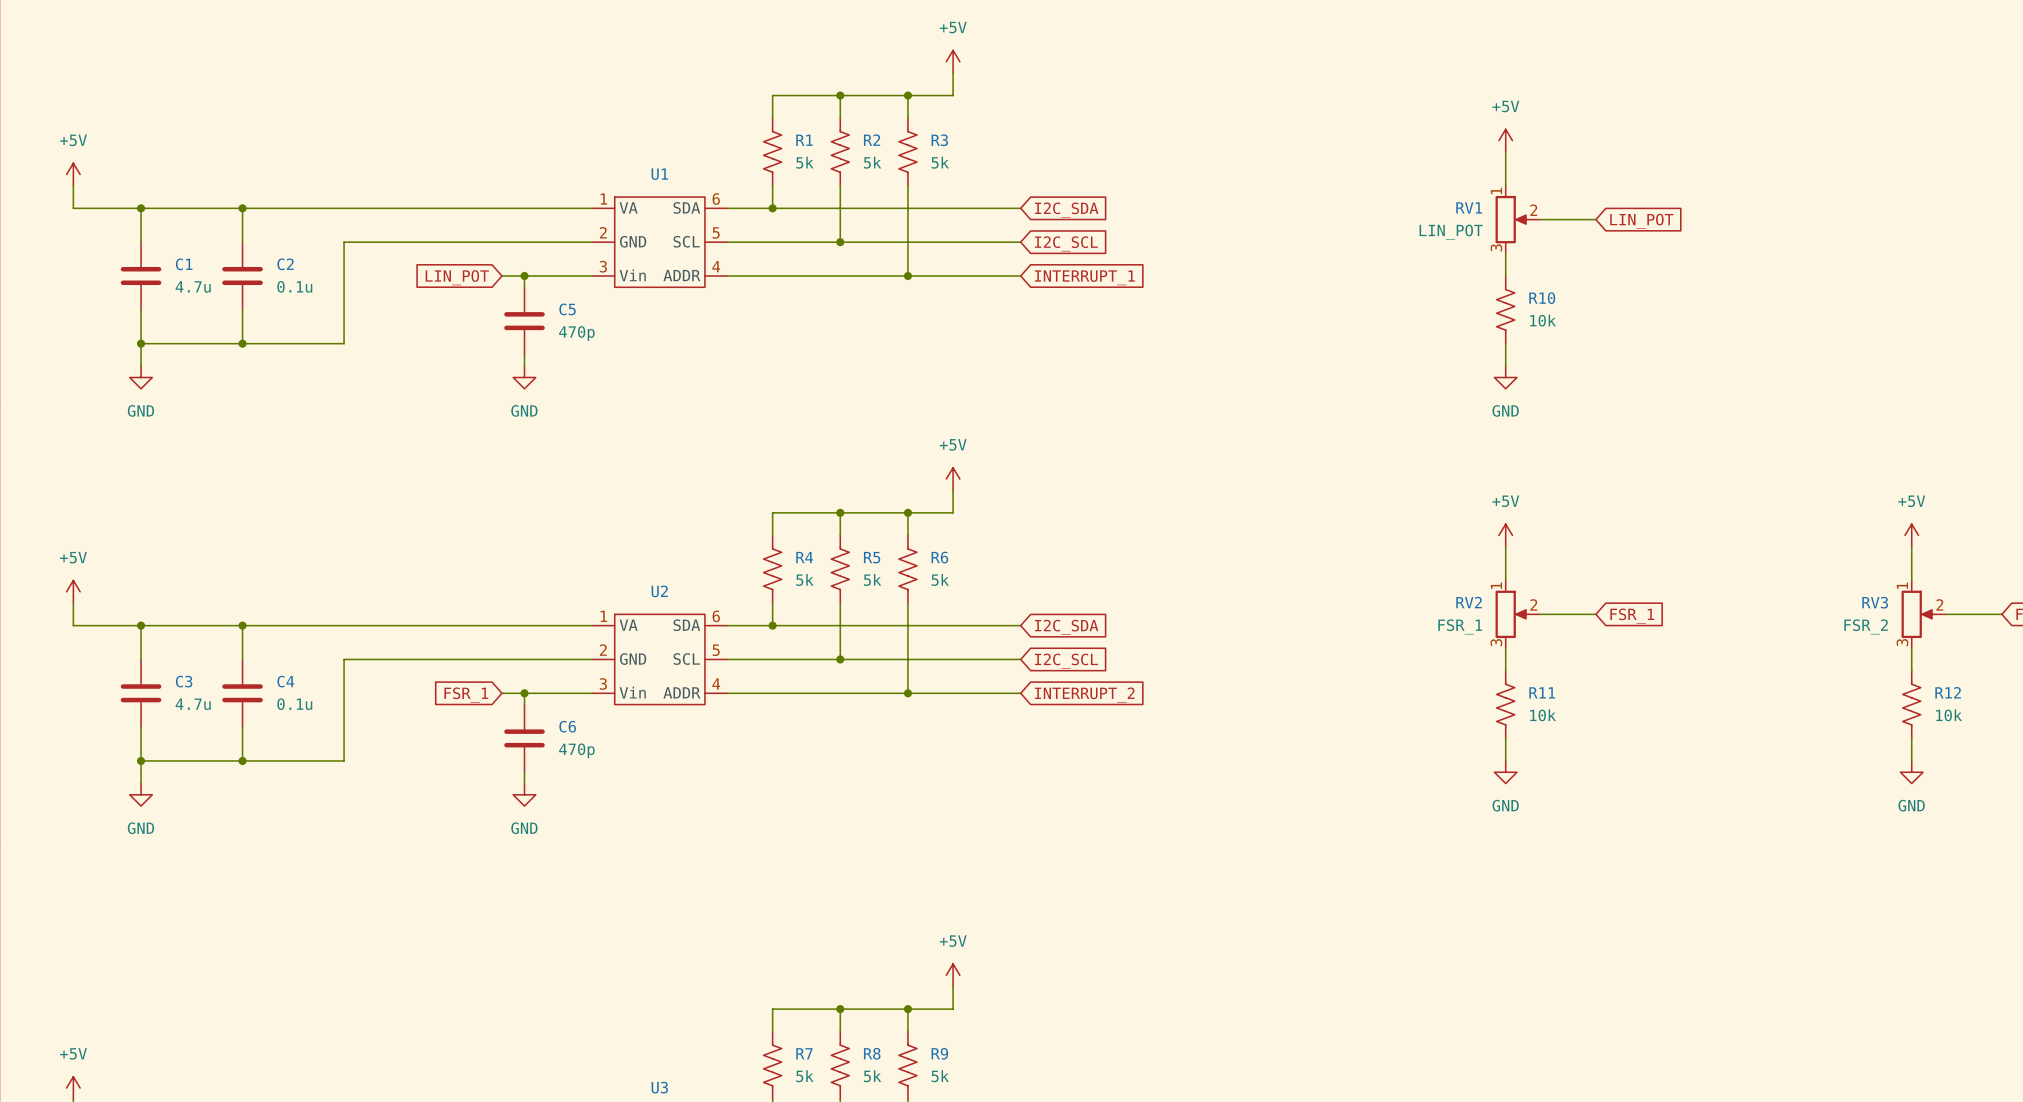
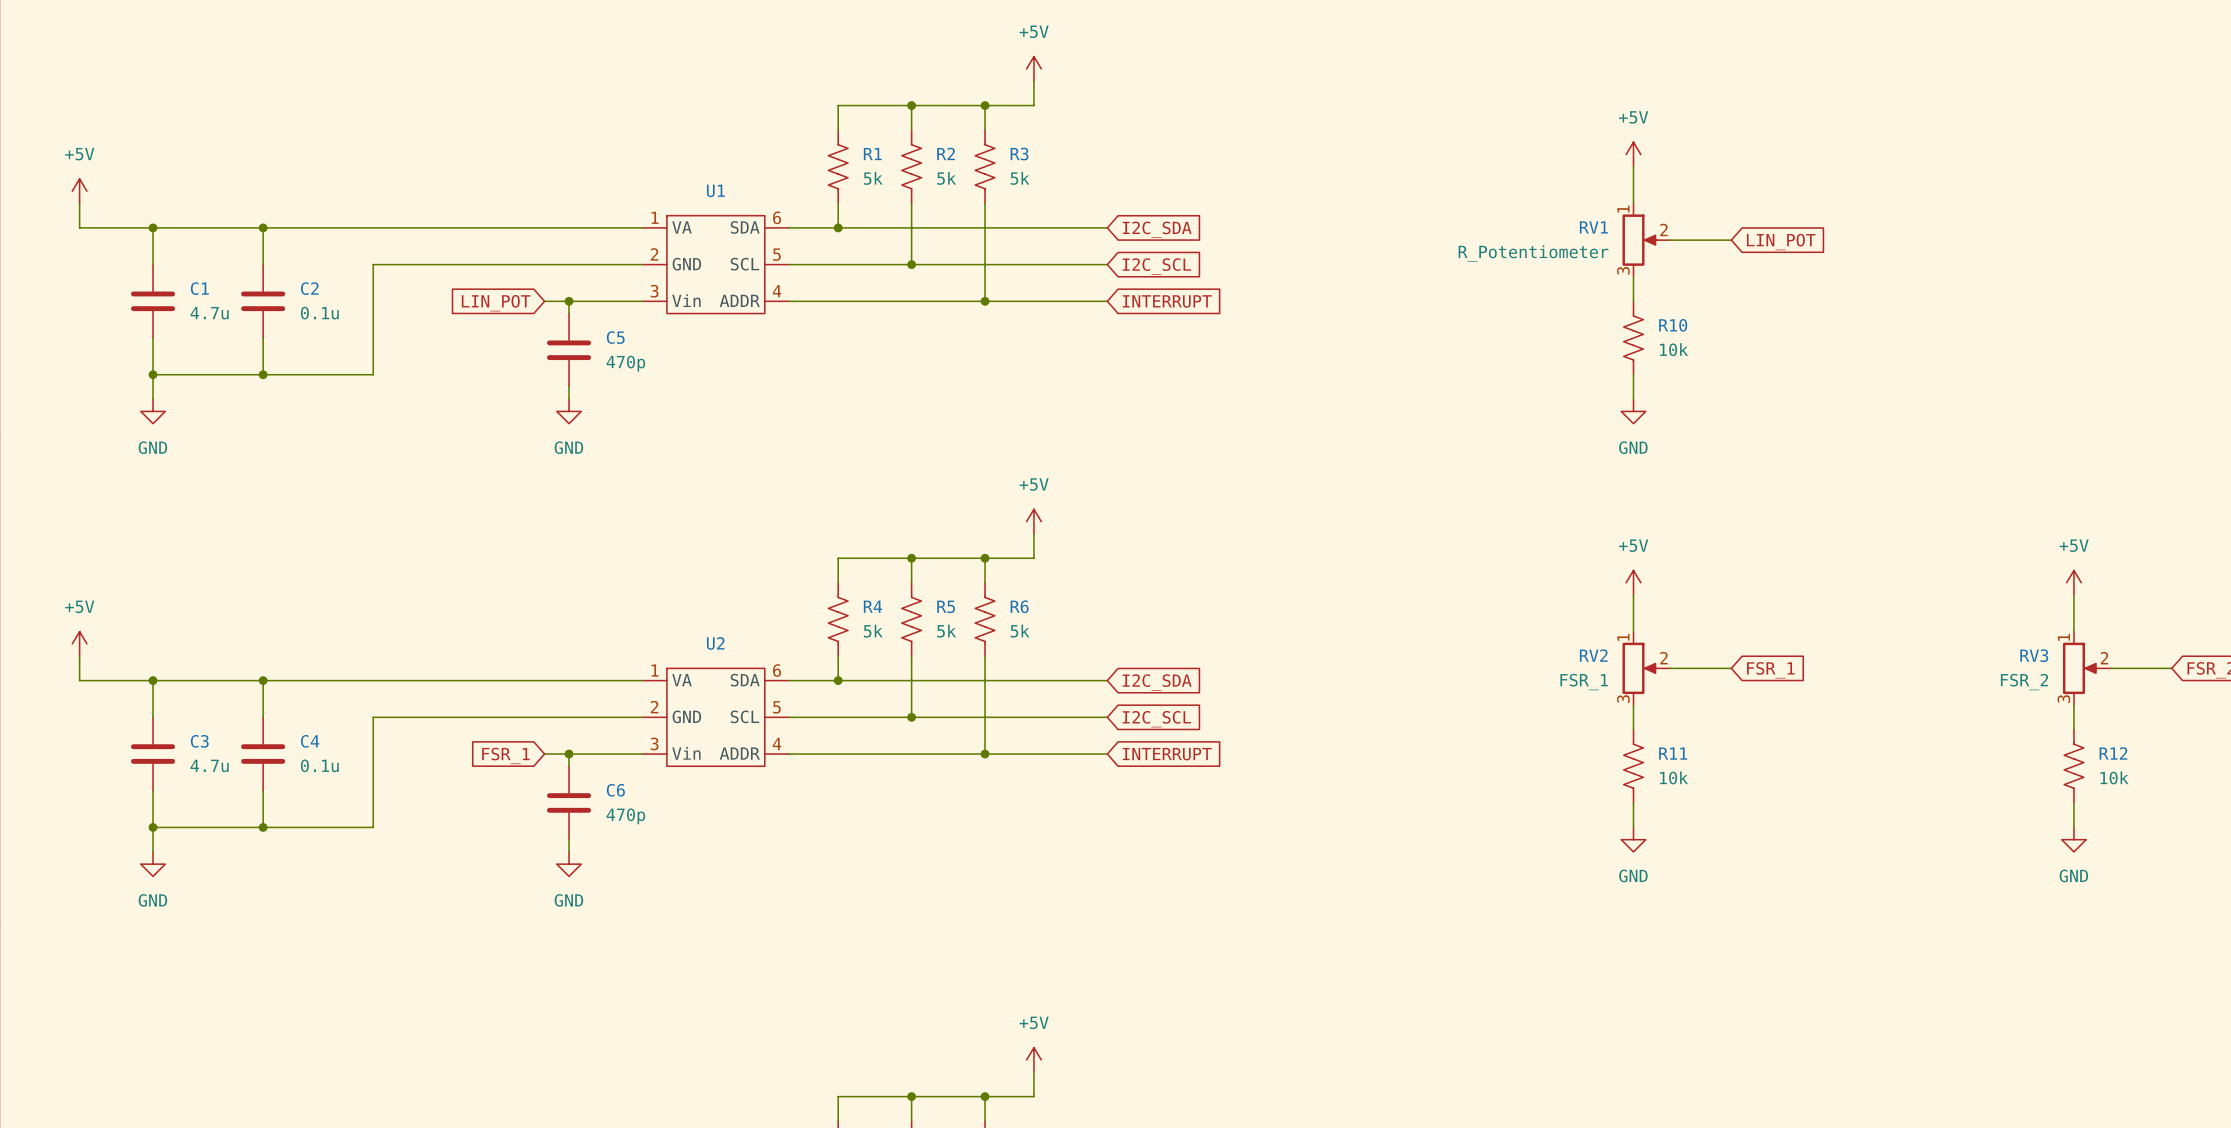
RV1 value: LIN_POT (1451, 232) -> R_Potentiometer (1533, 253)
global label: INTERRUPT_1 (1084, 277) -> INTERRUPT (1167, 301)
global label: INTERRUPT_2 (1084, 695) -> INTERRUPT (1167, 754)

